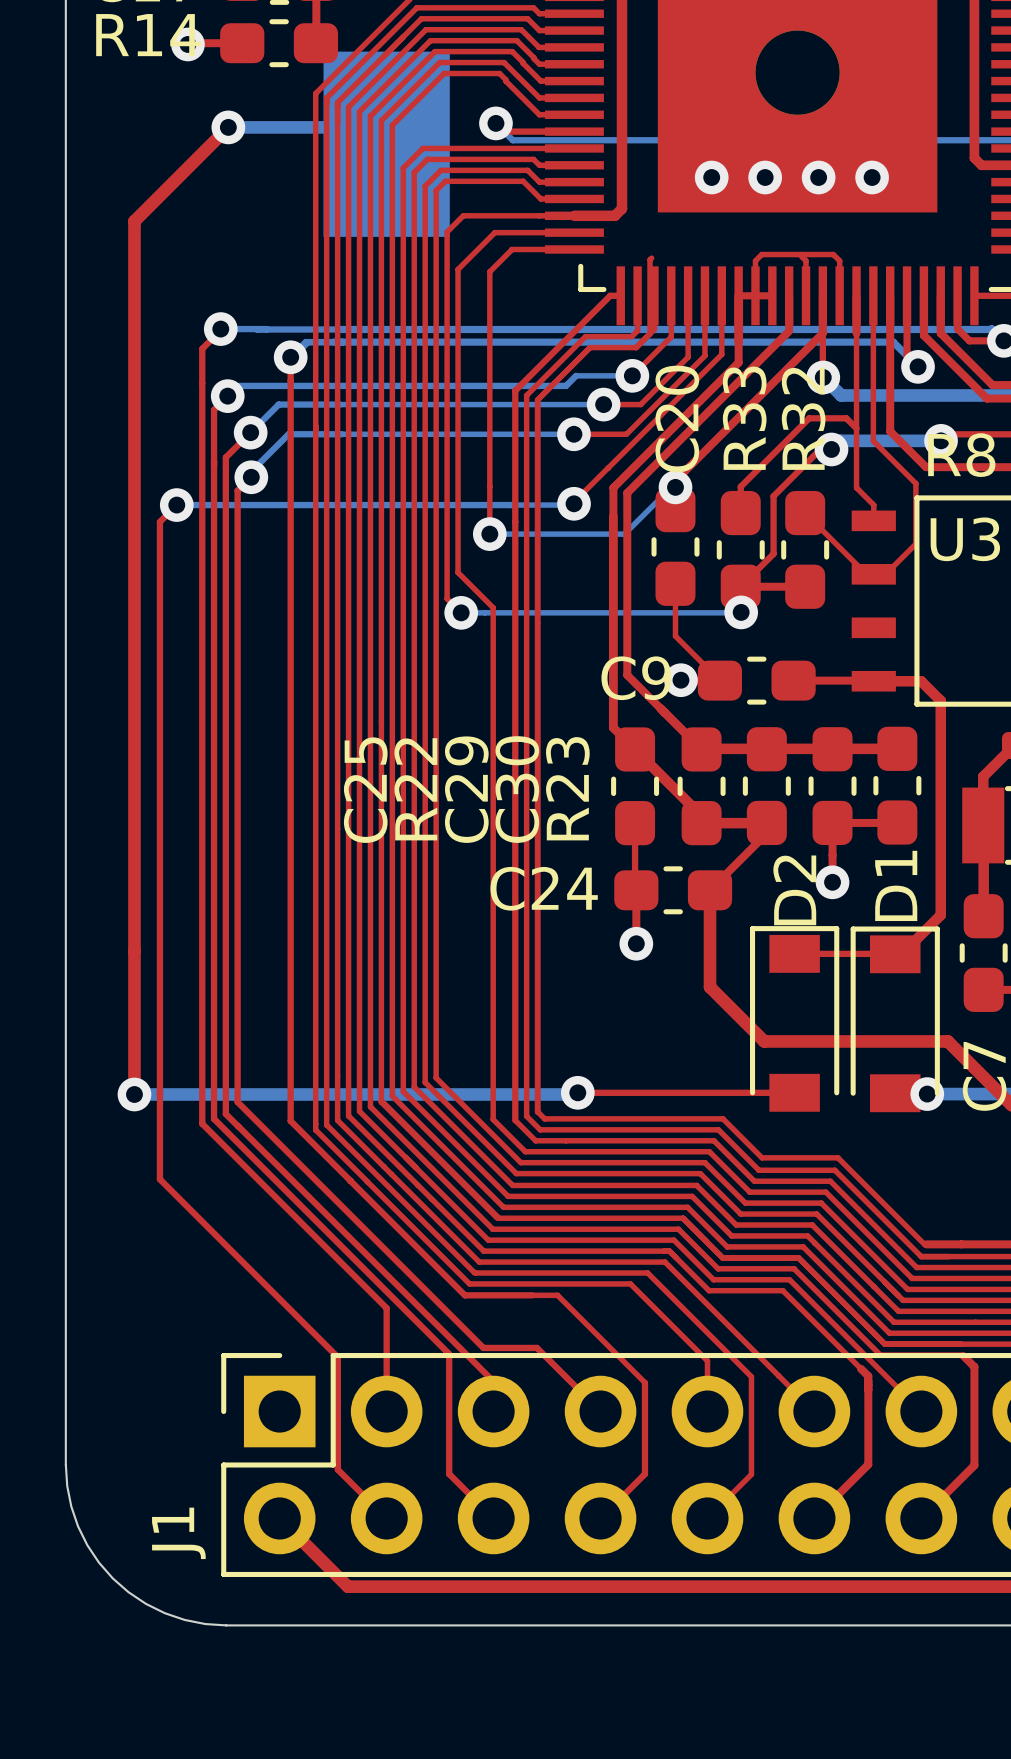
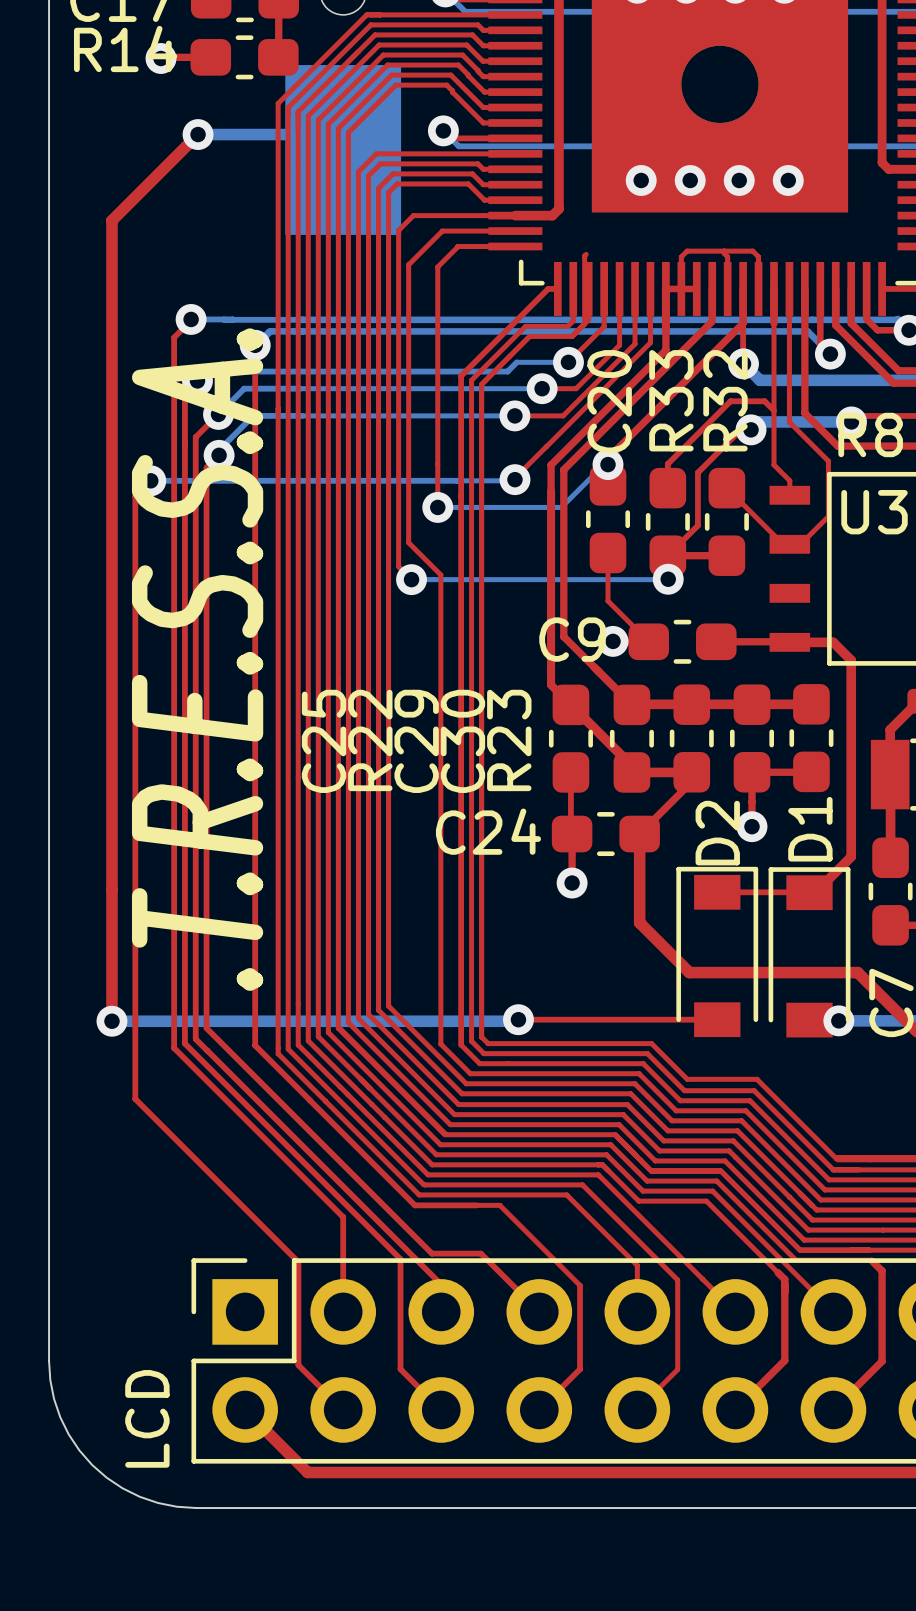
text: none -> .T.R.E.S.S.A. (197, 659)
J1 name: J1 (178, 1533) -> LCD (147, 1418)

